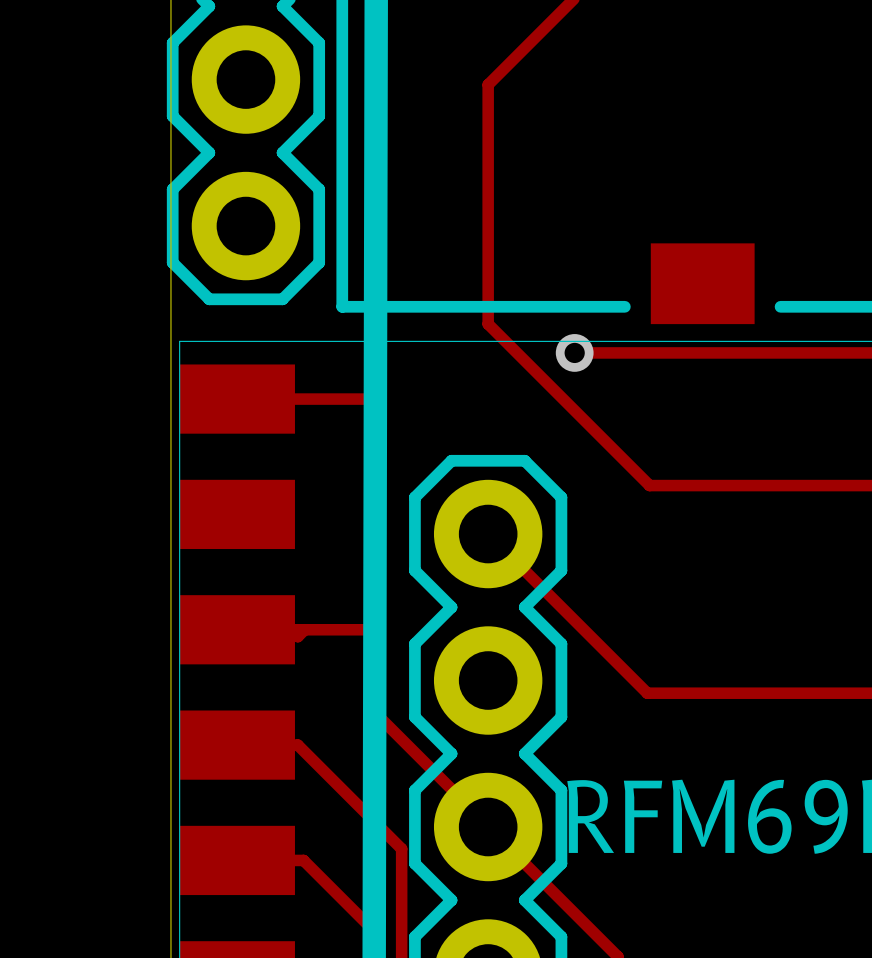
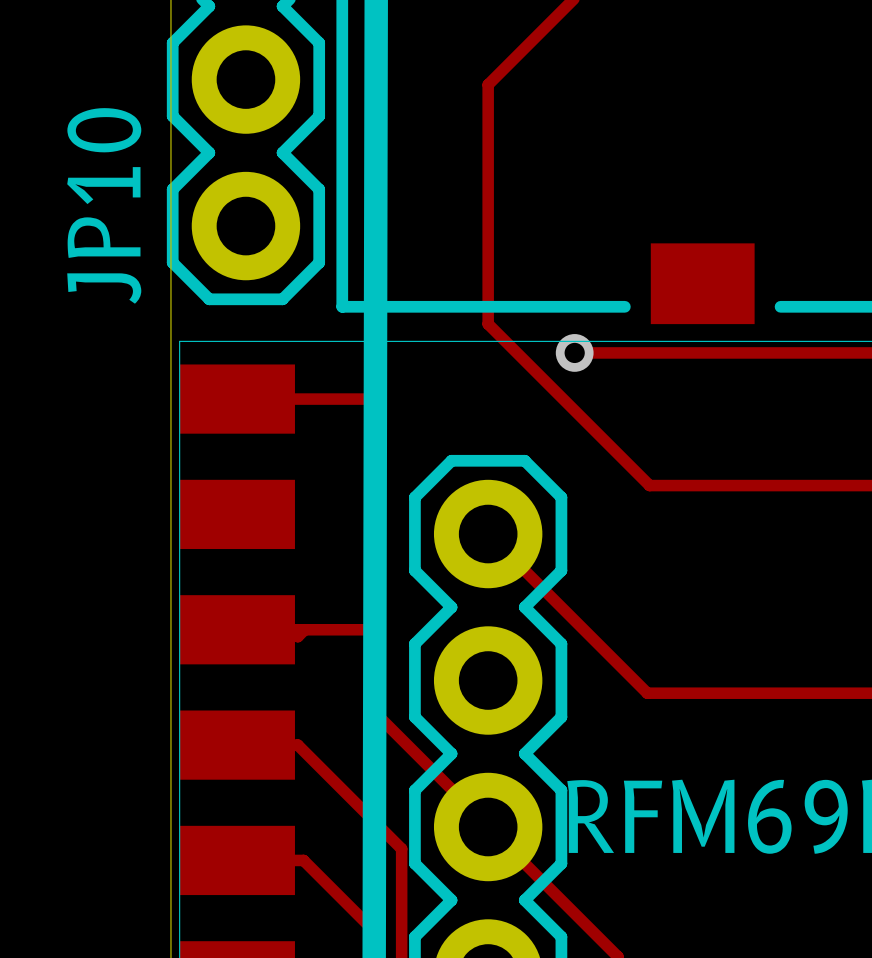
JP10 name: none -> JP10 (104, 205)

